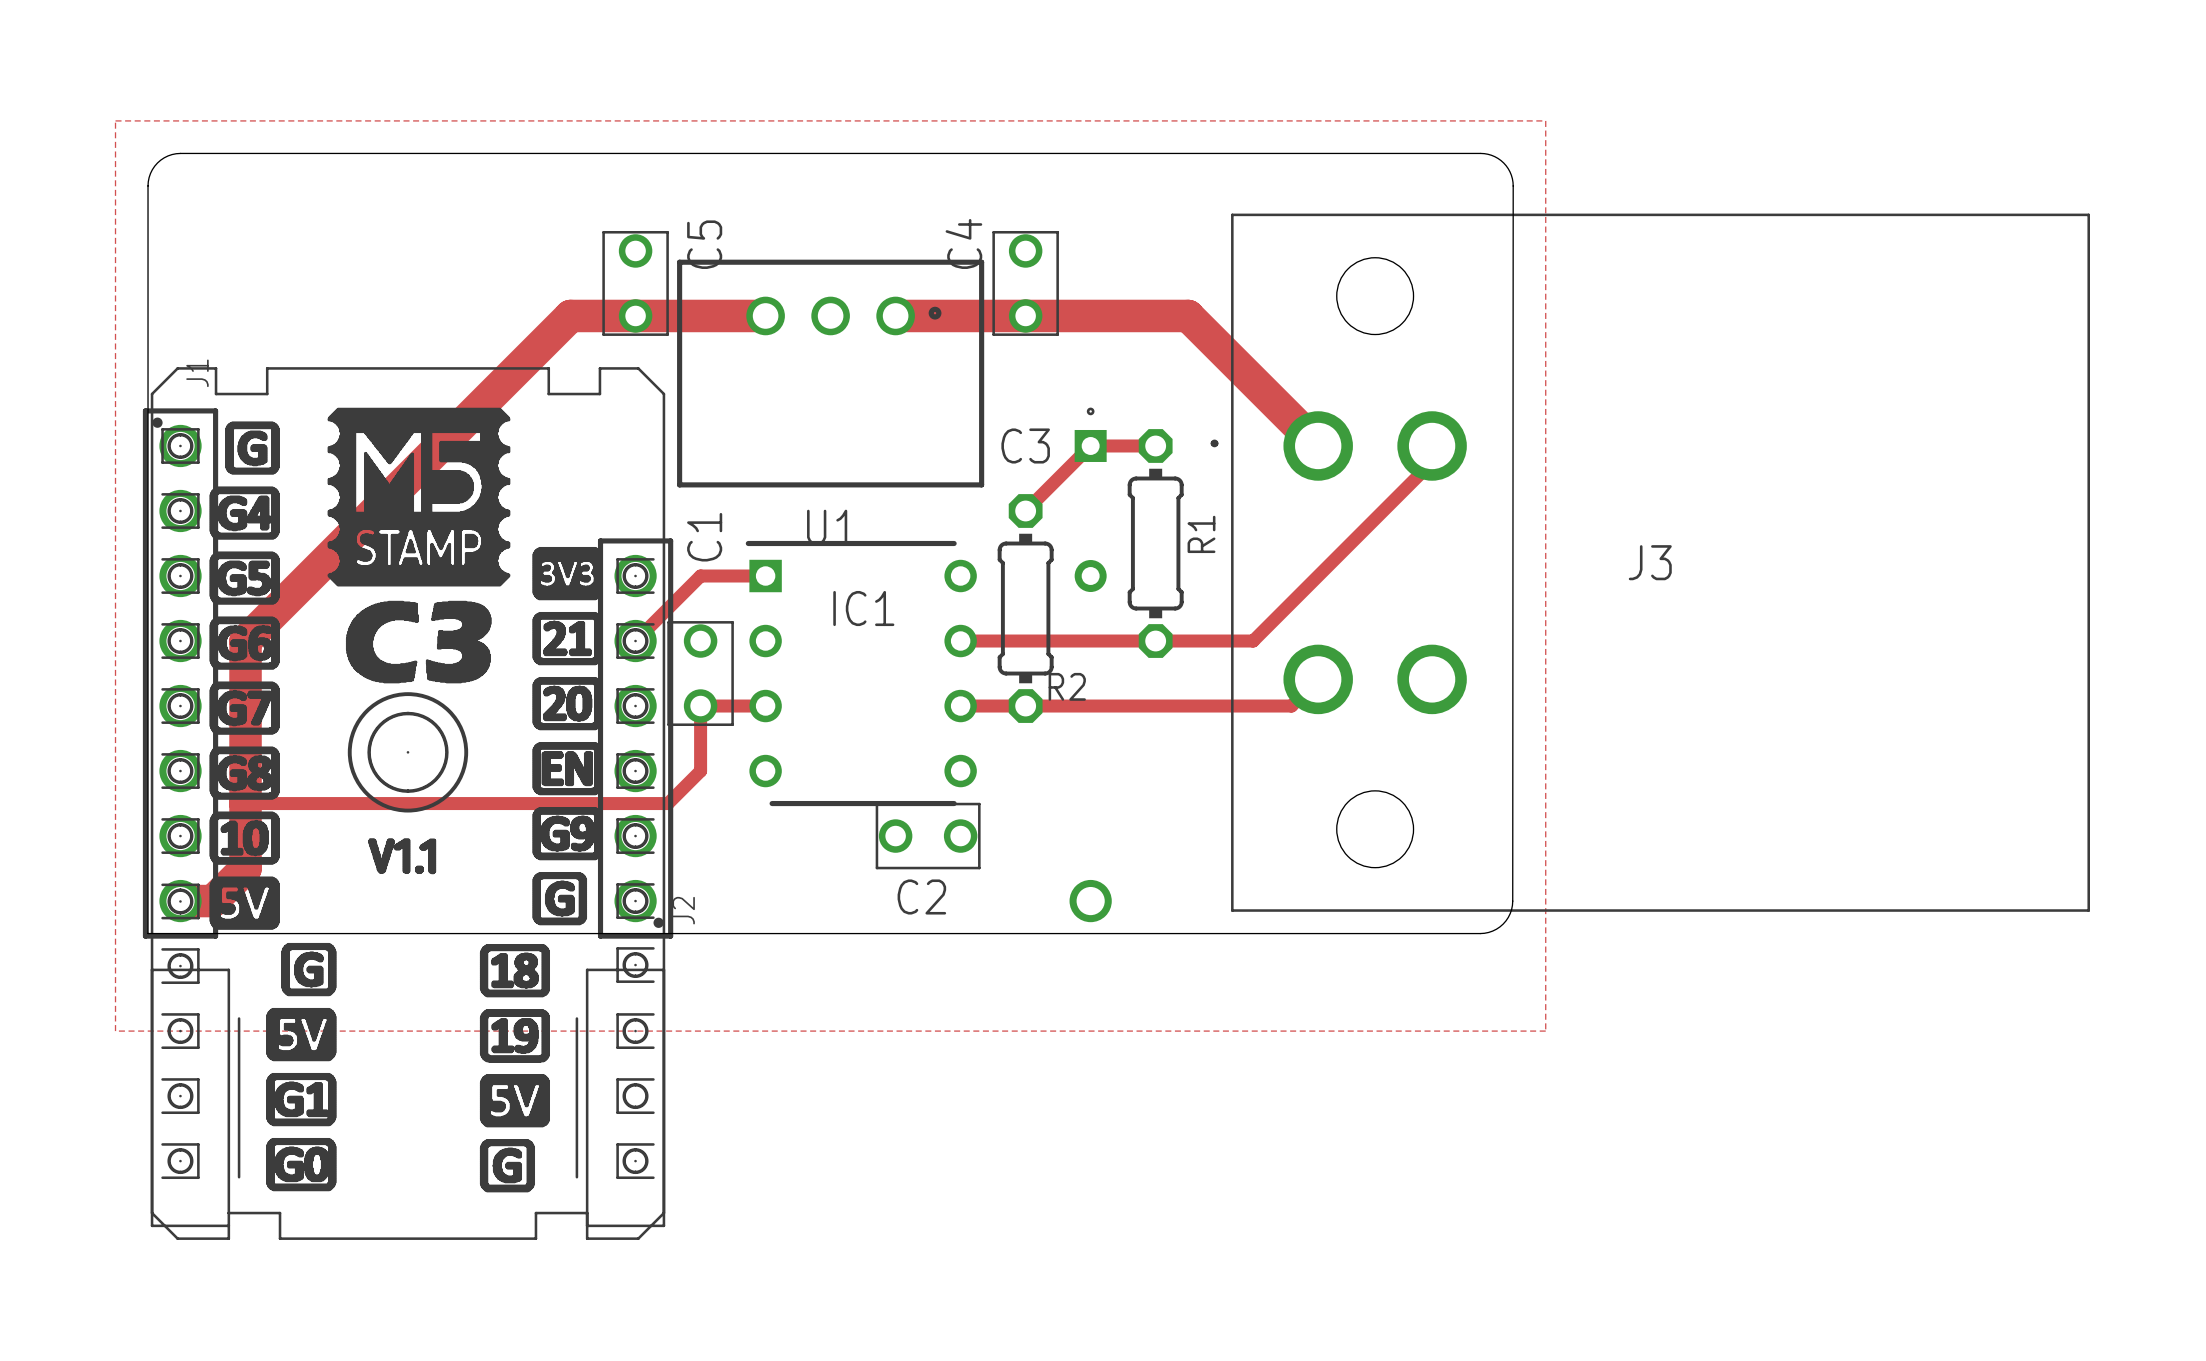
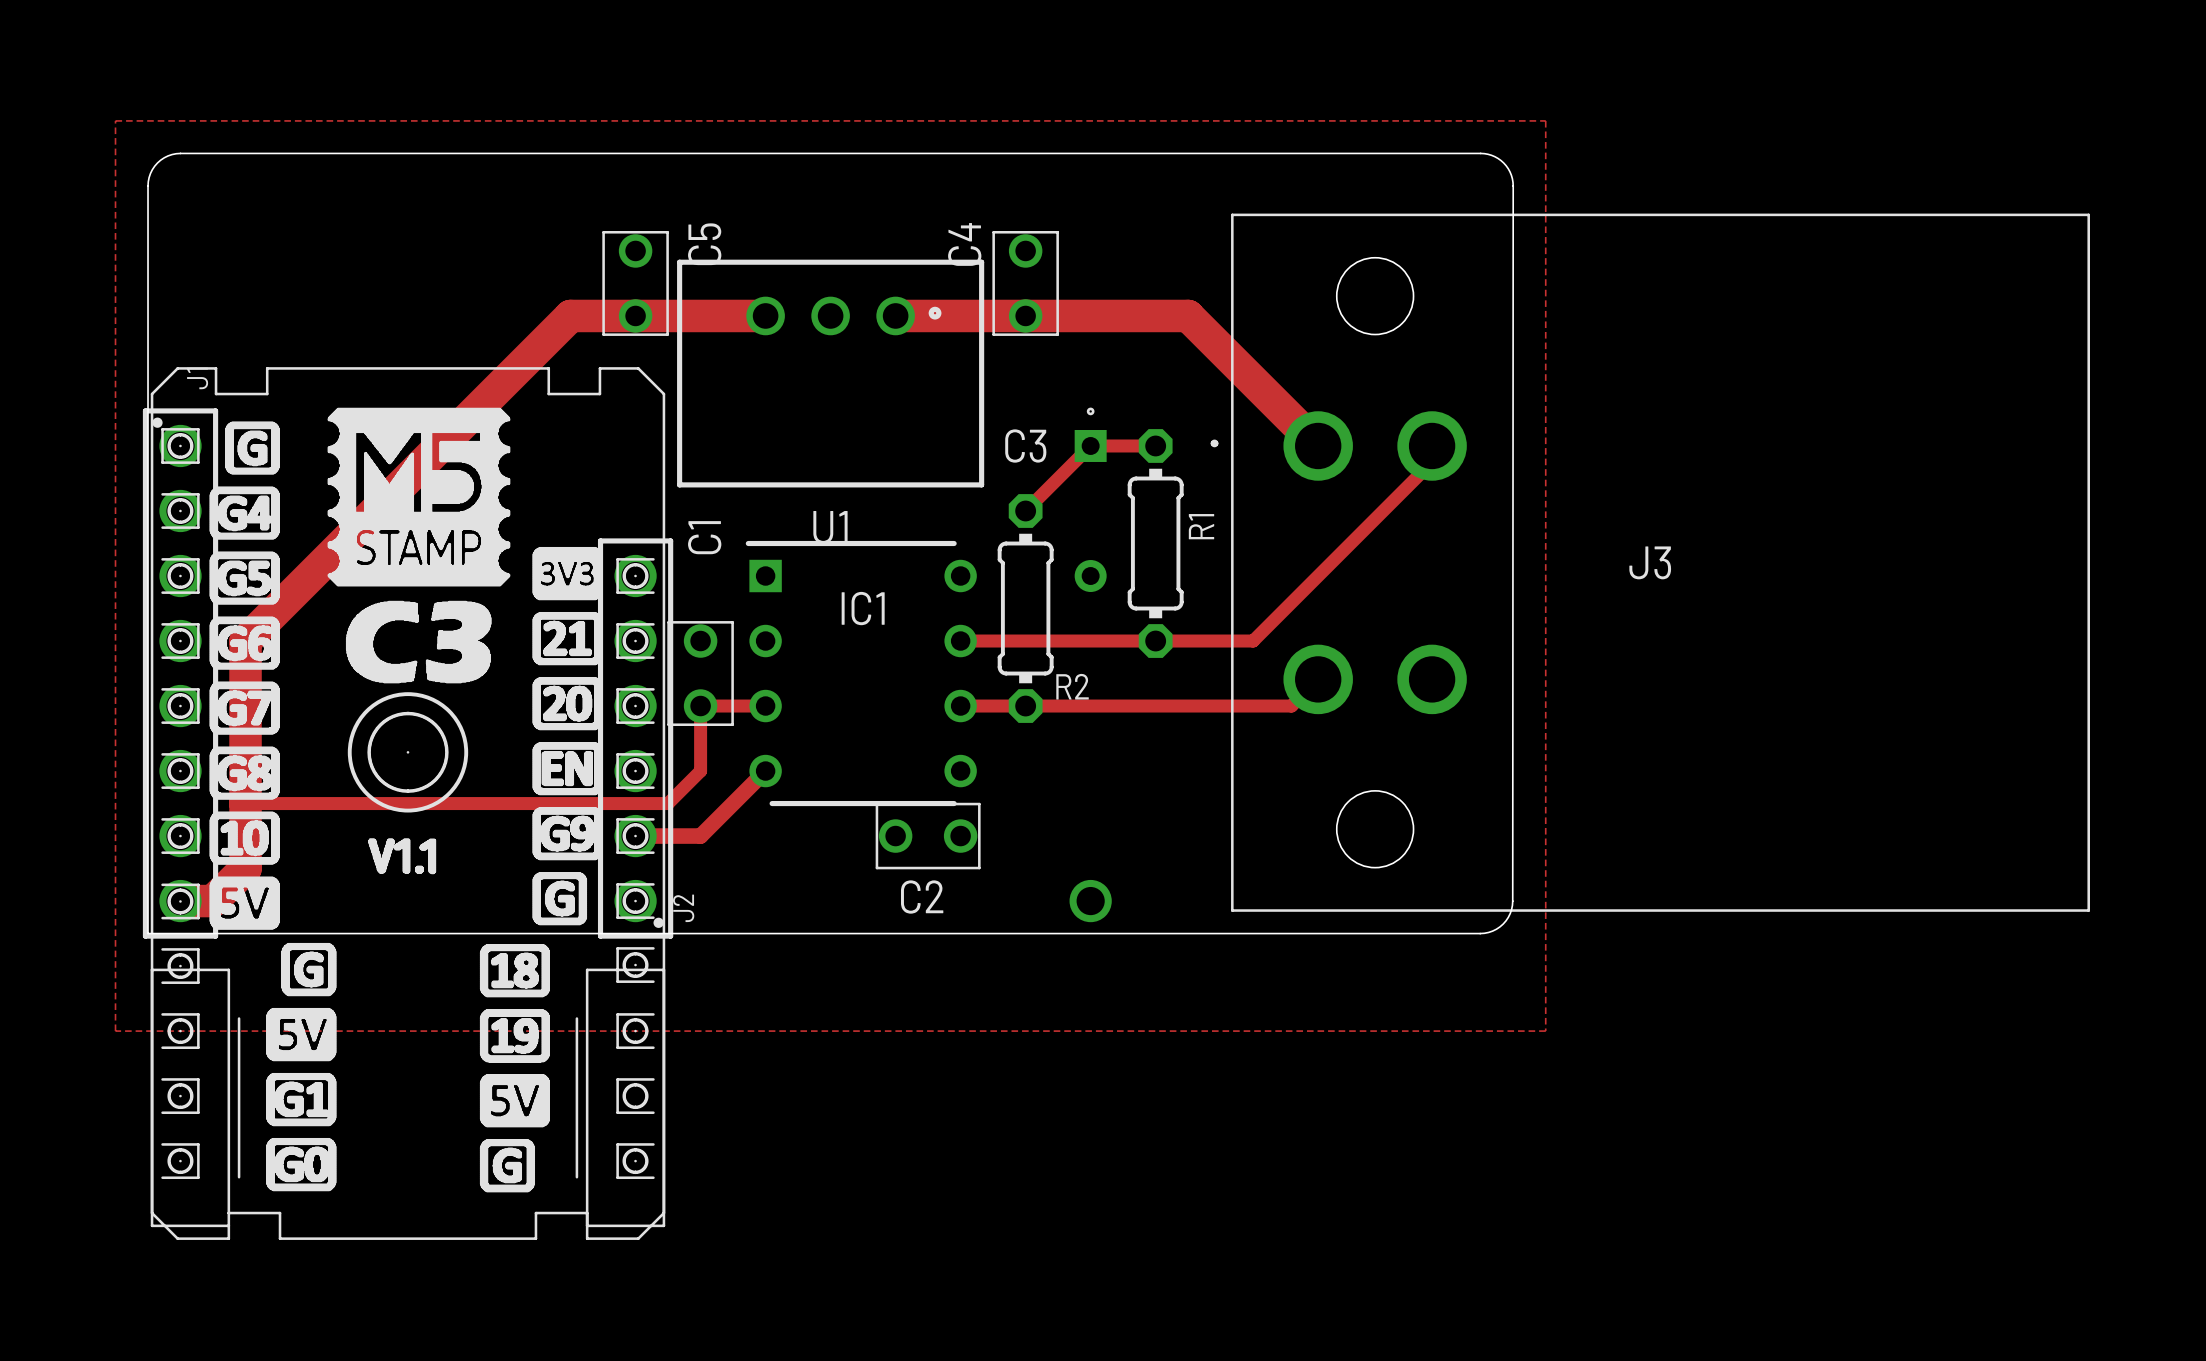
track: (765, 576) (700, 576) (635, 641) -> none
track: none -> (765, 771) (700, 836) (635, 836)

